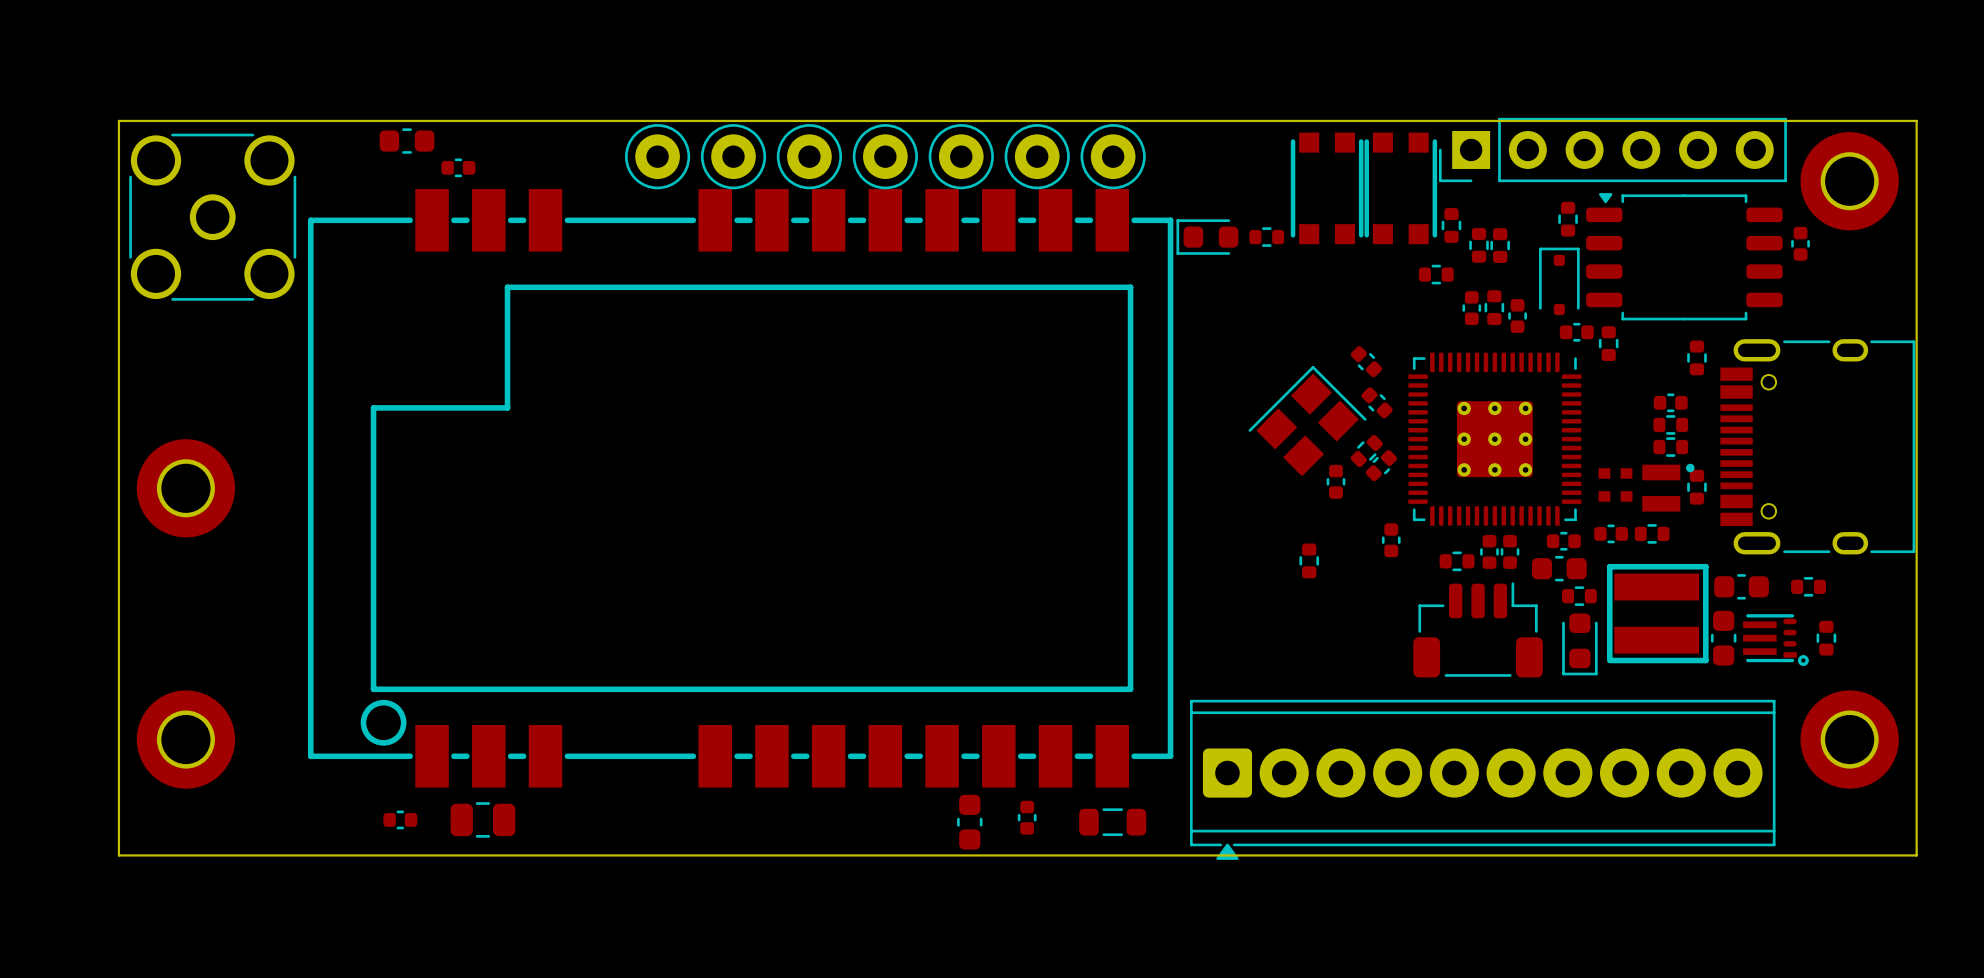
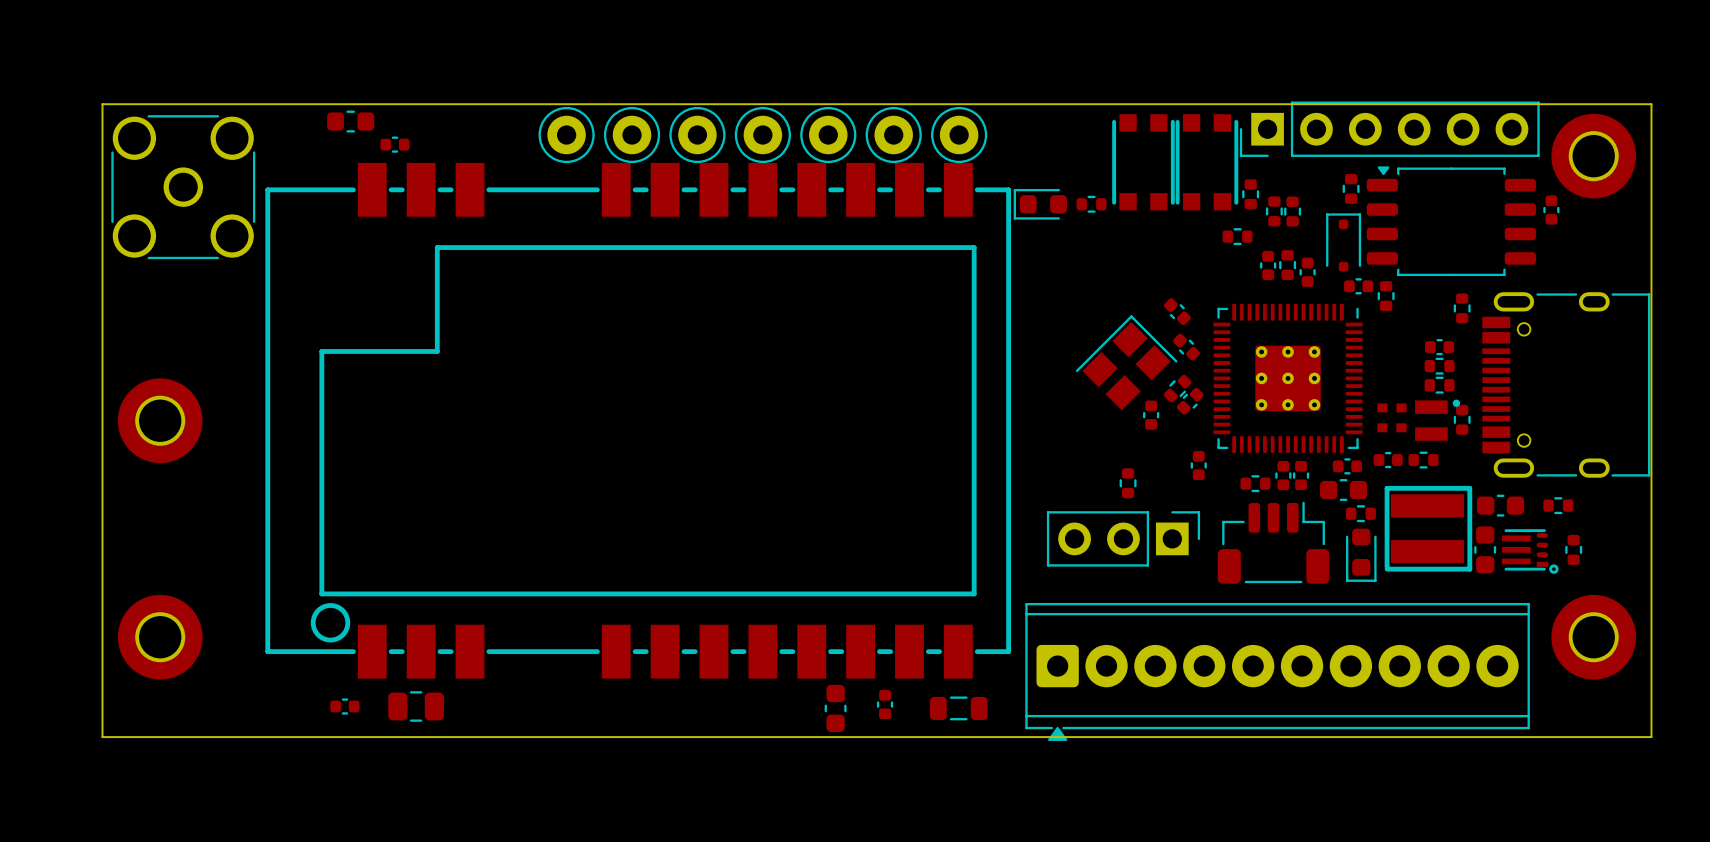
part: none -> (1123, 538)

